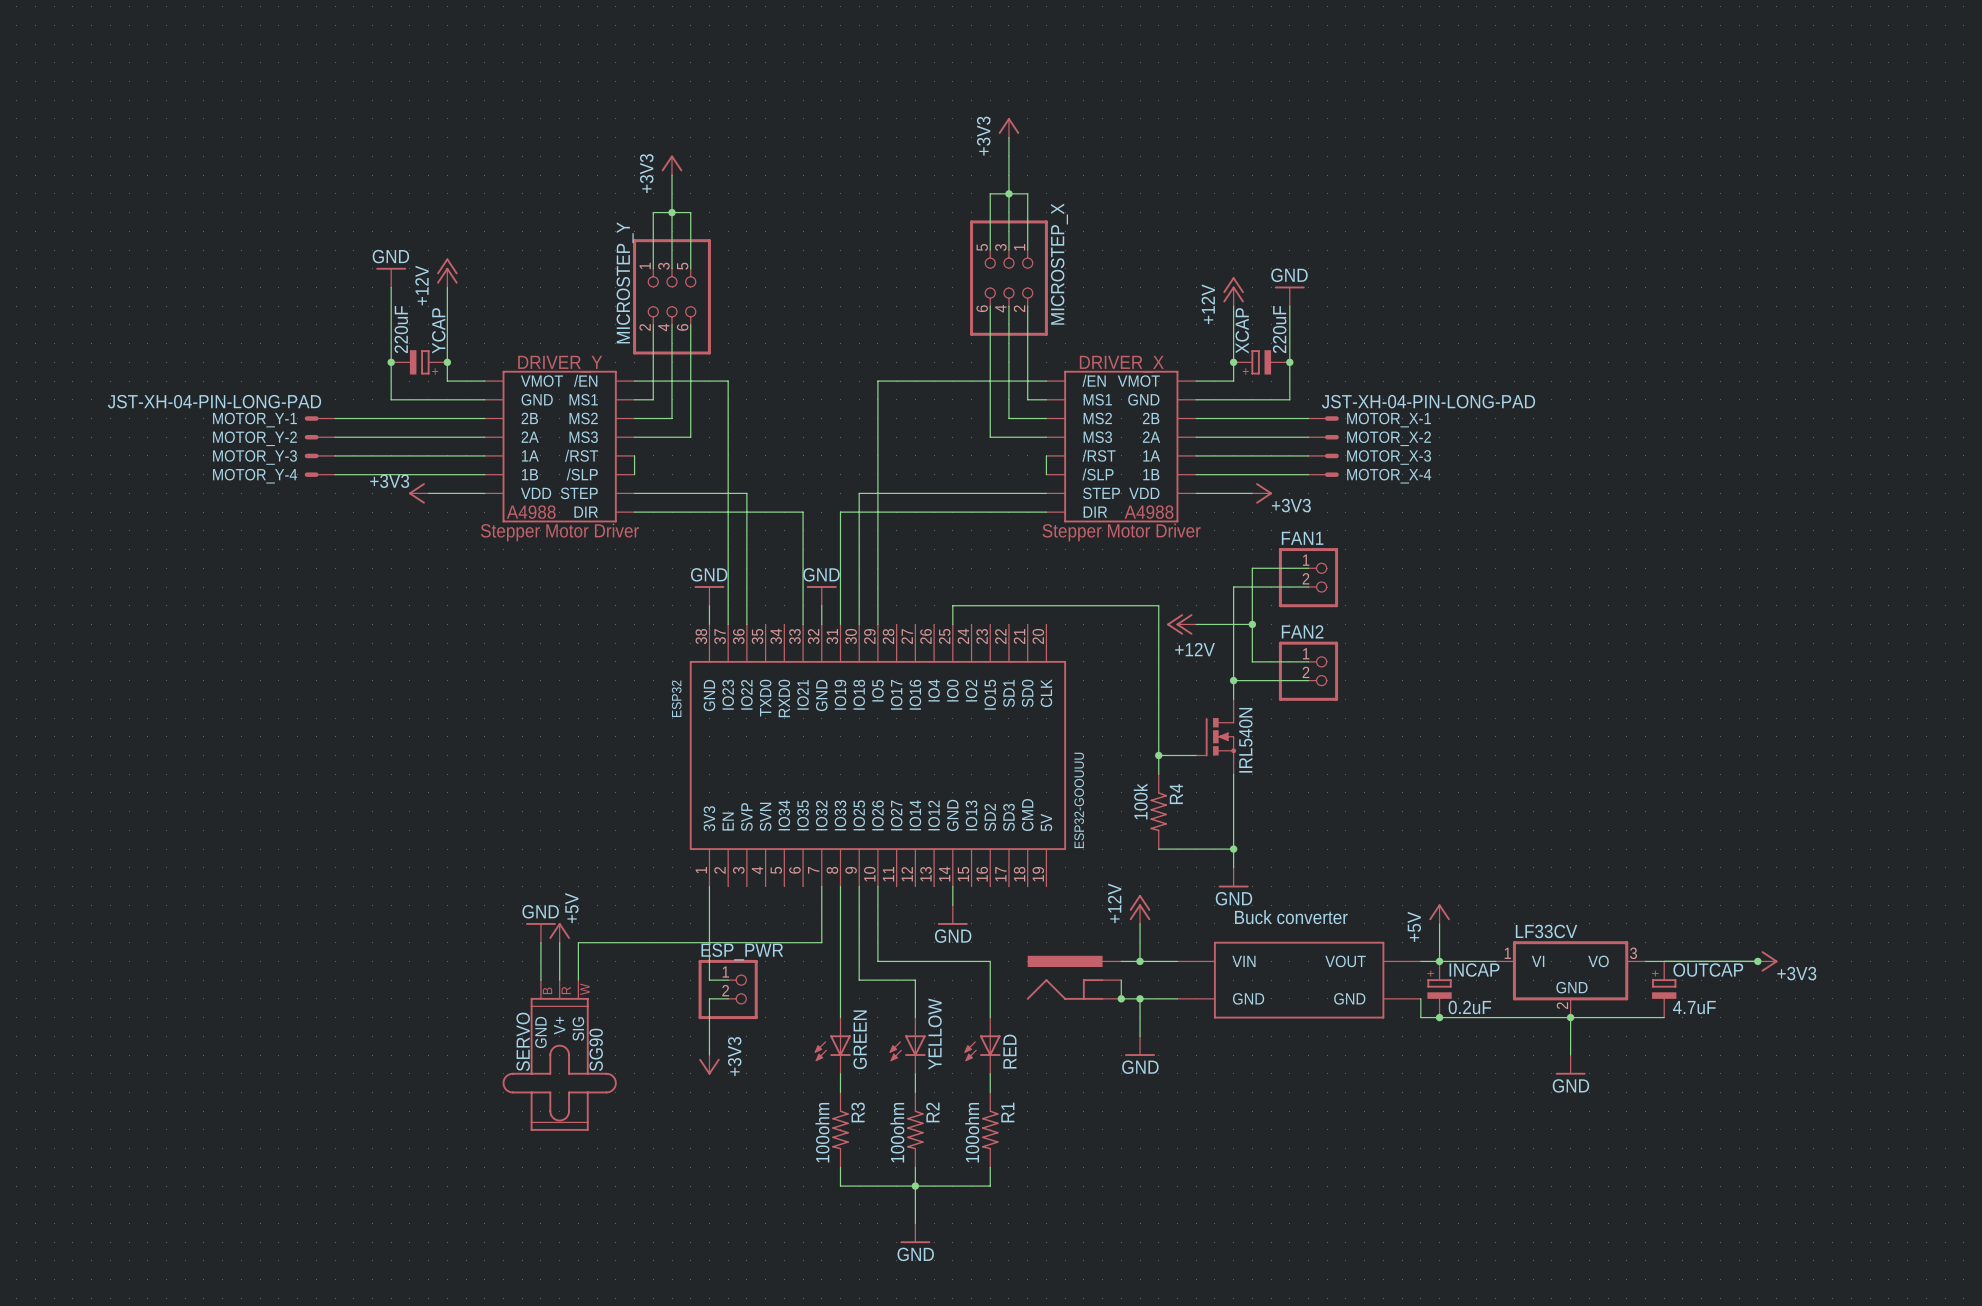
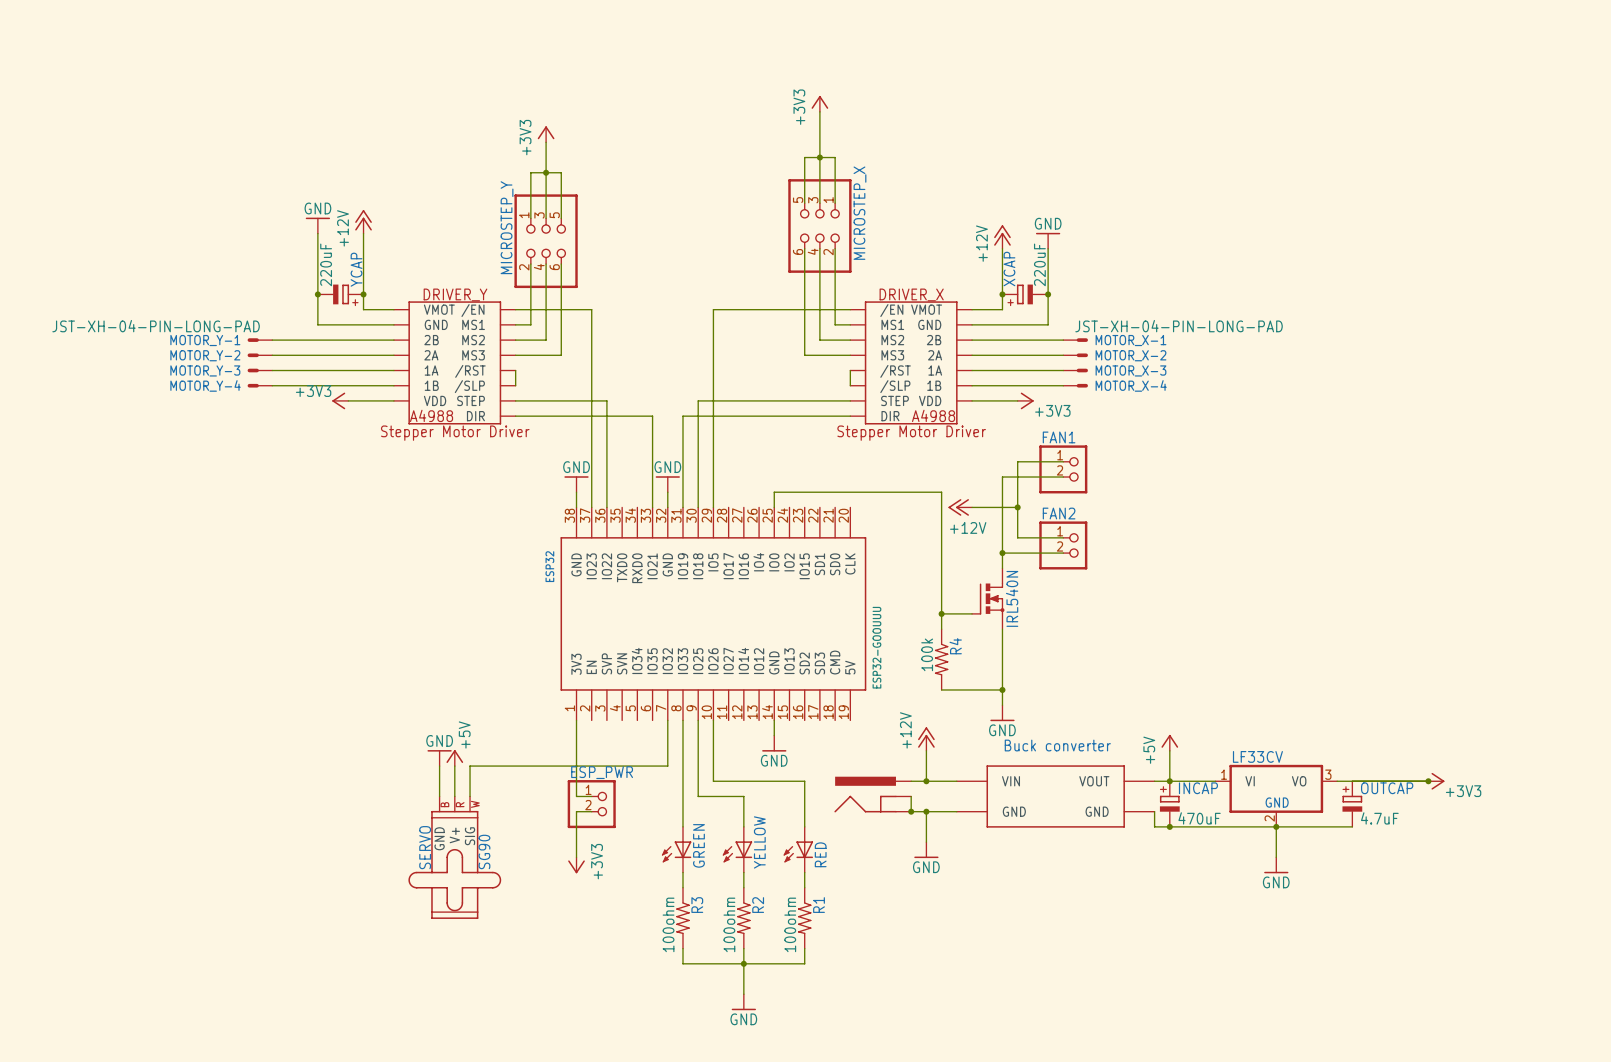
INCAP value: 0.2uF (1469, 1007) -> 470uF (1199, 818)

